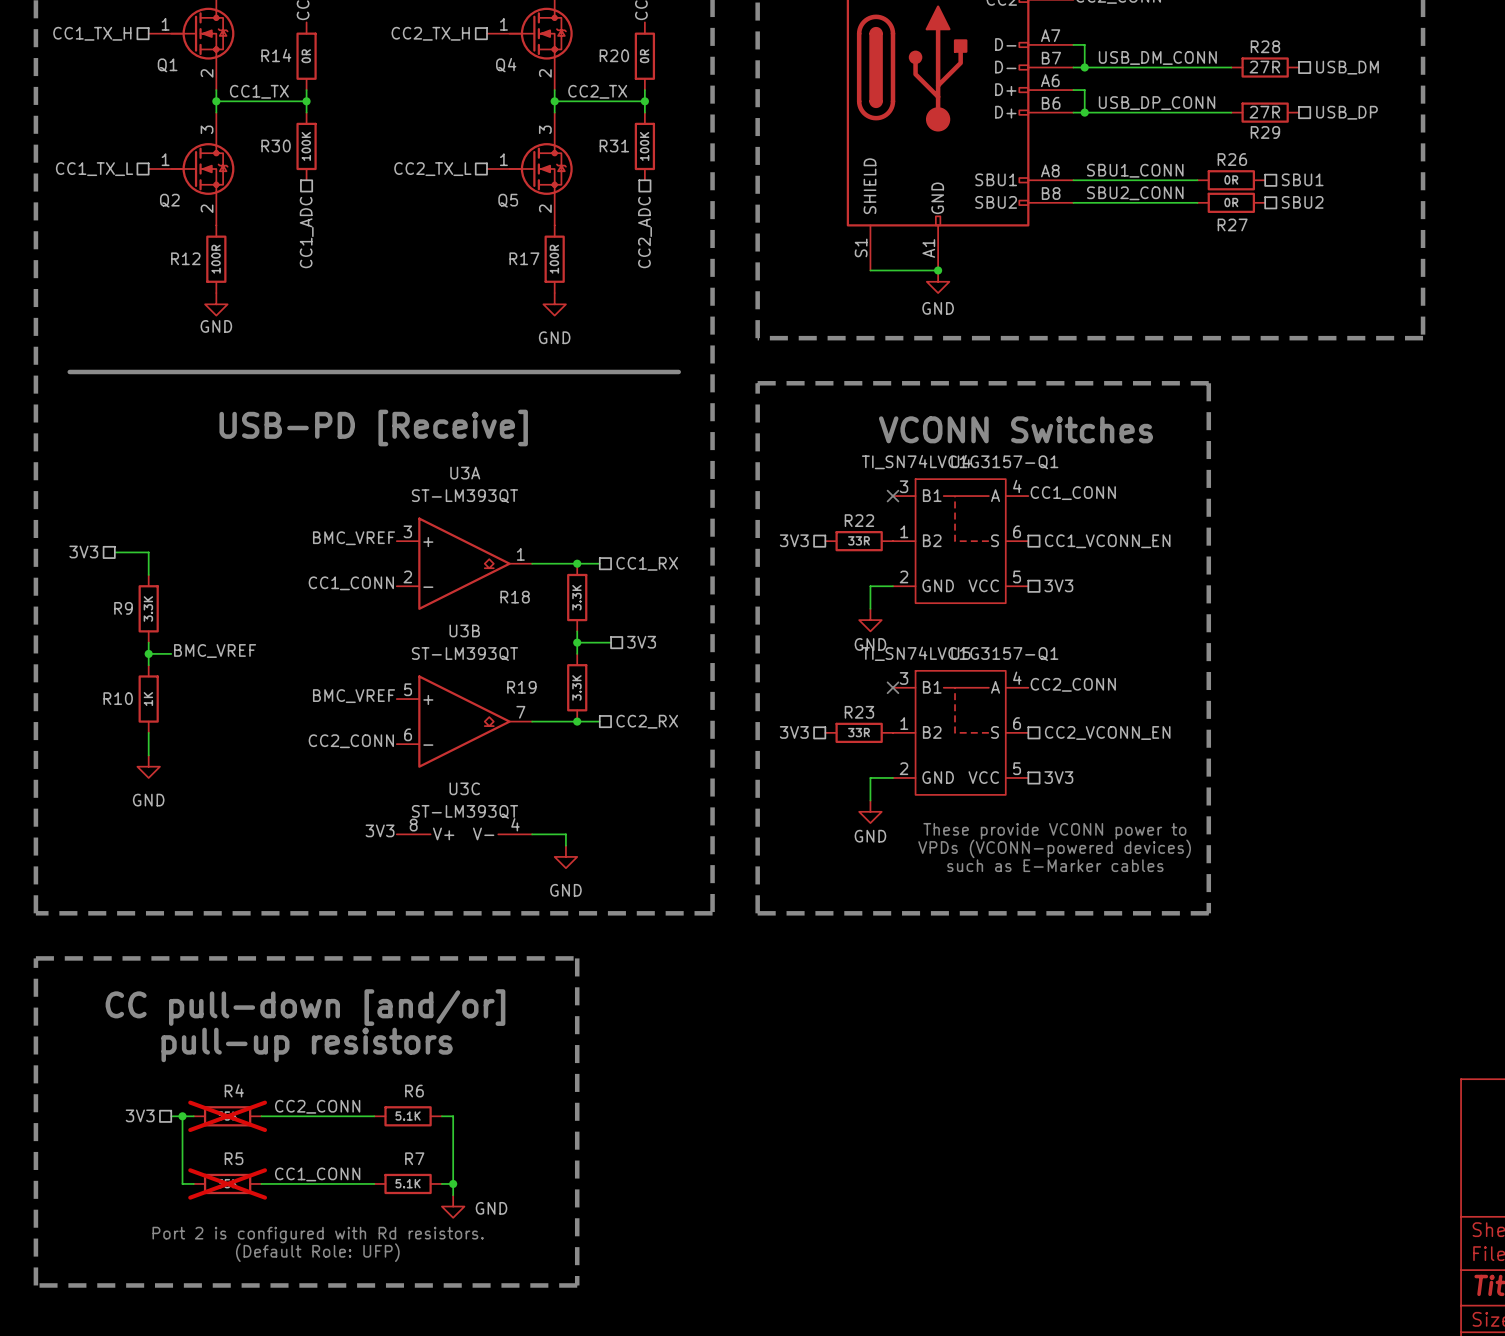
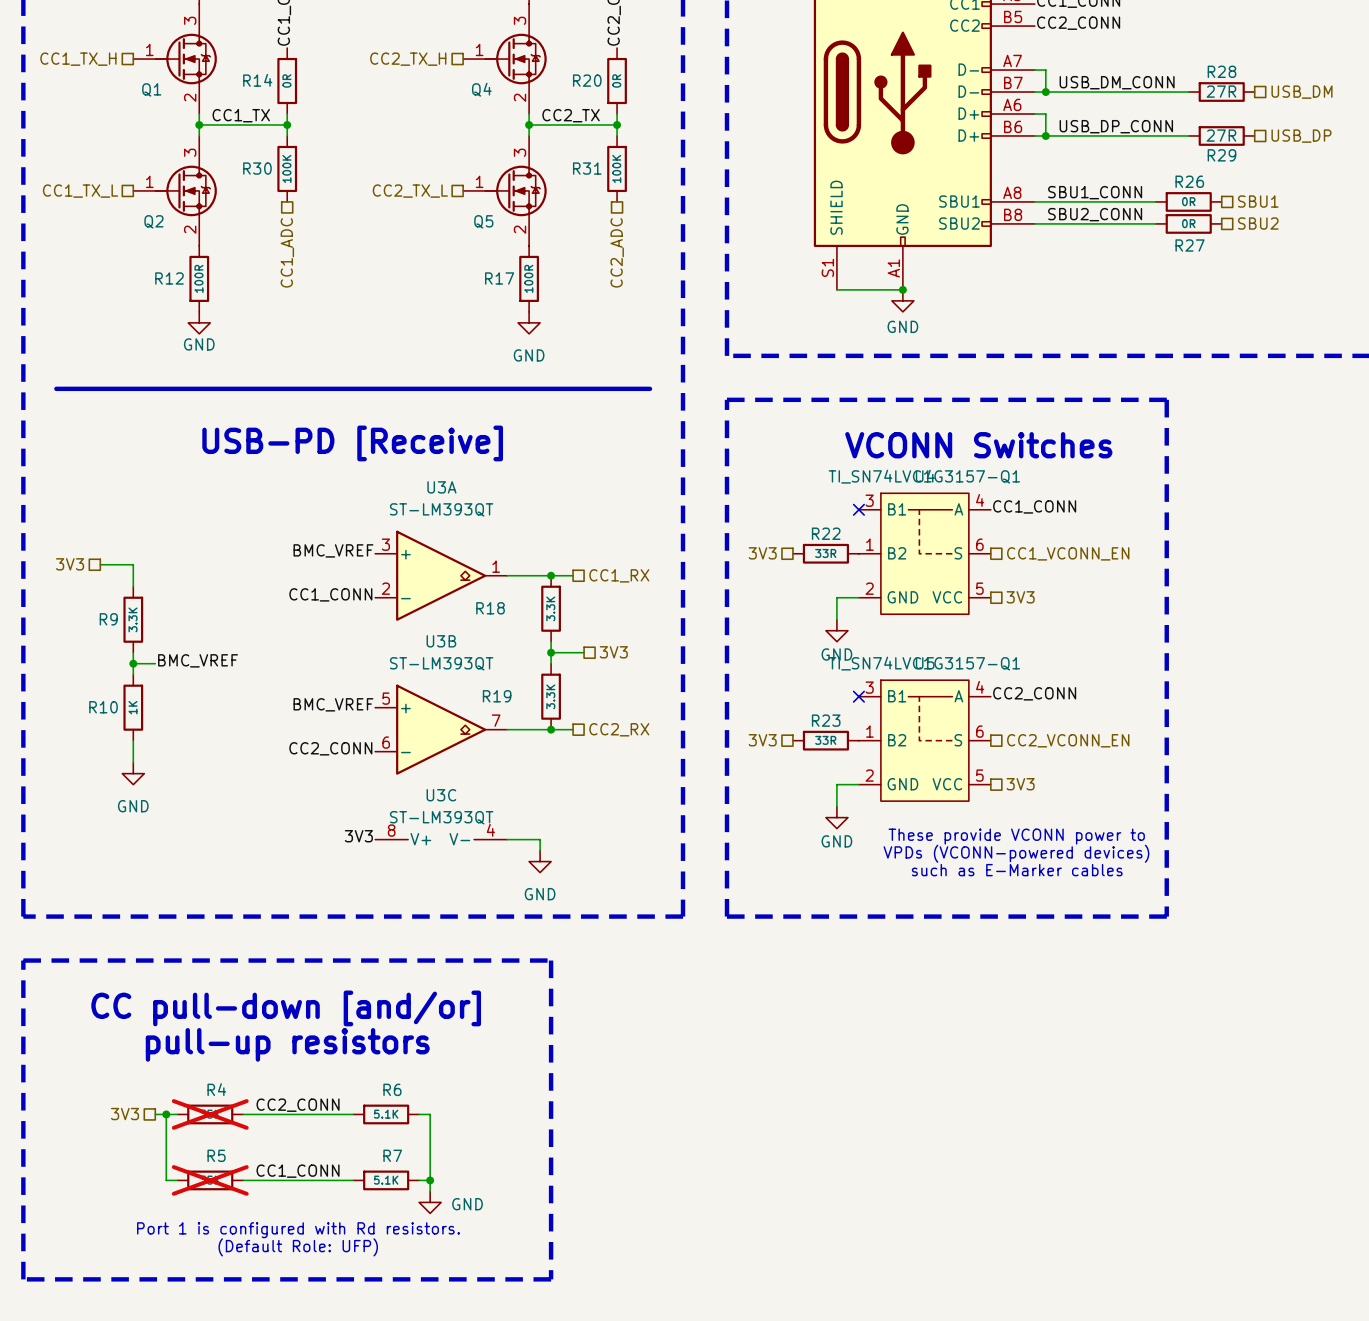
text: Port 2 is configured with Rd resistors. (318, 1235) -> Port 1 is configured with Rd resistors. (298, 1230)

